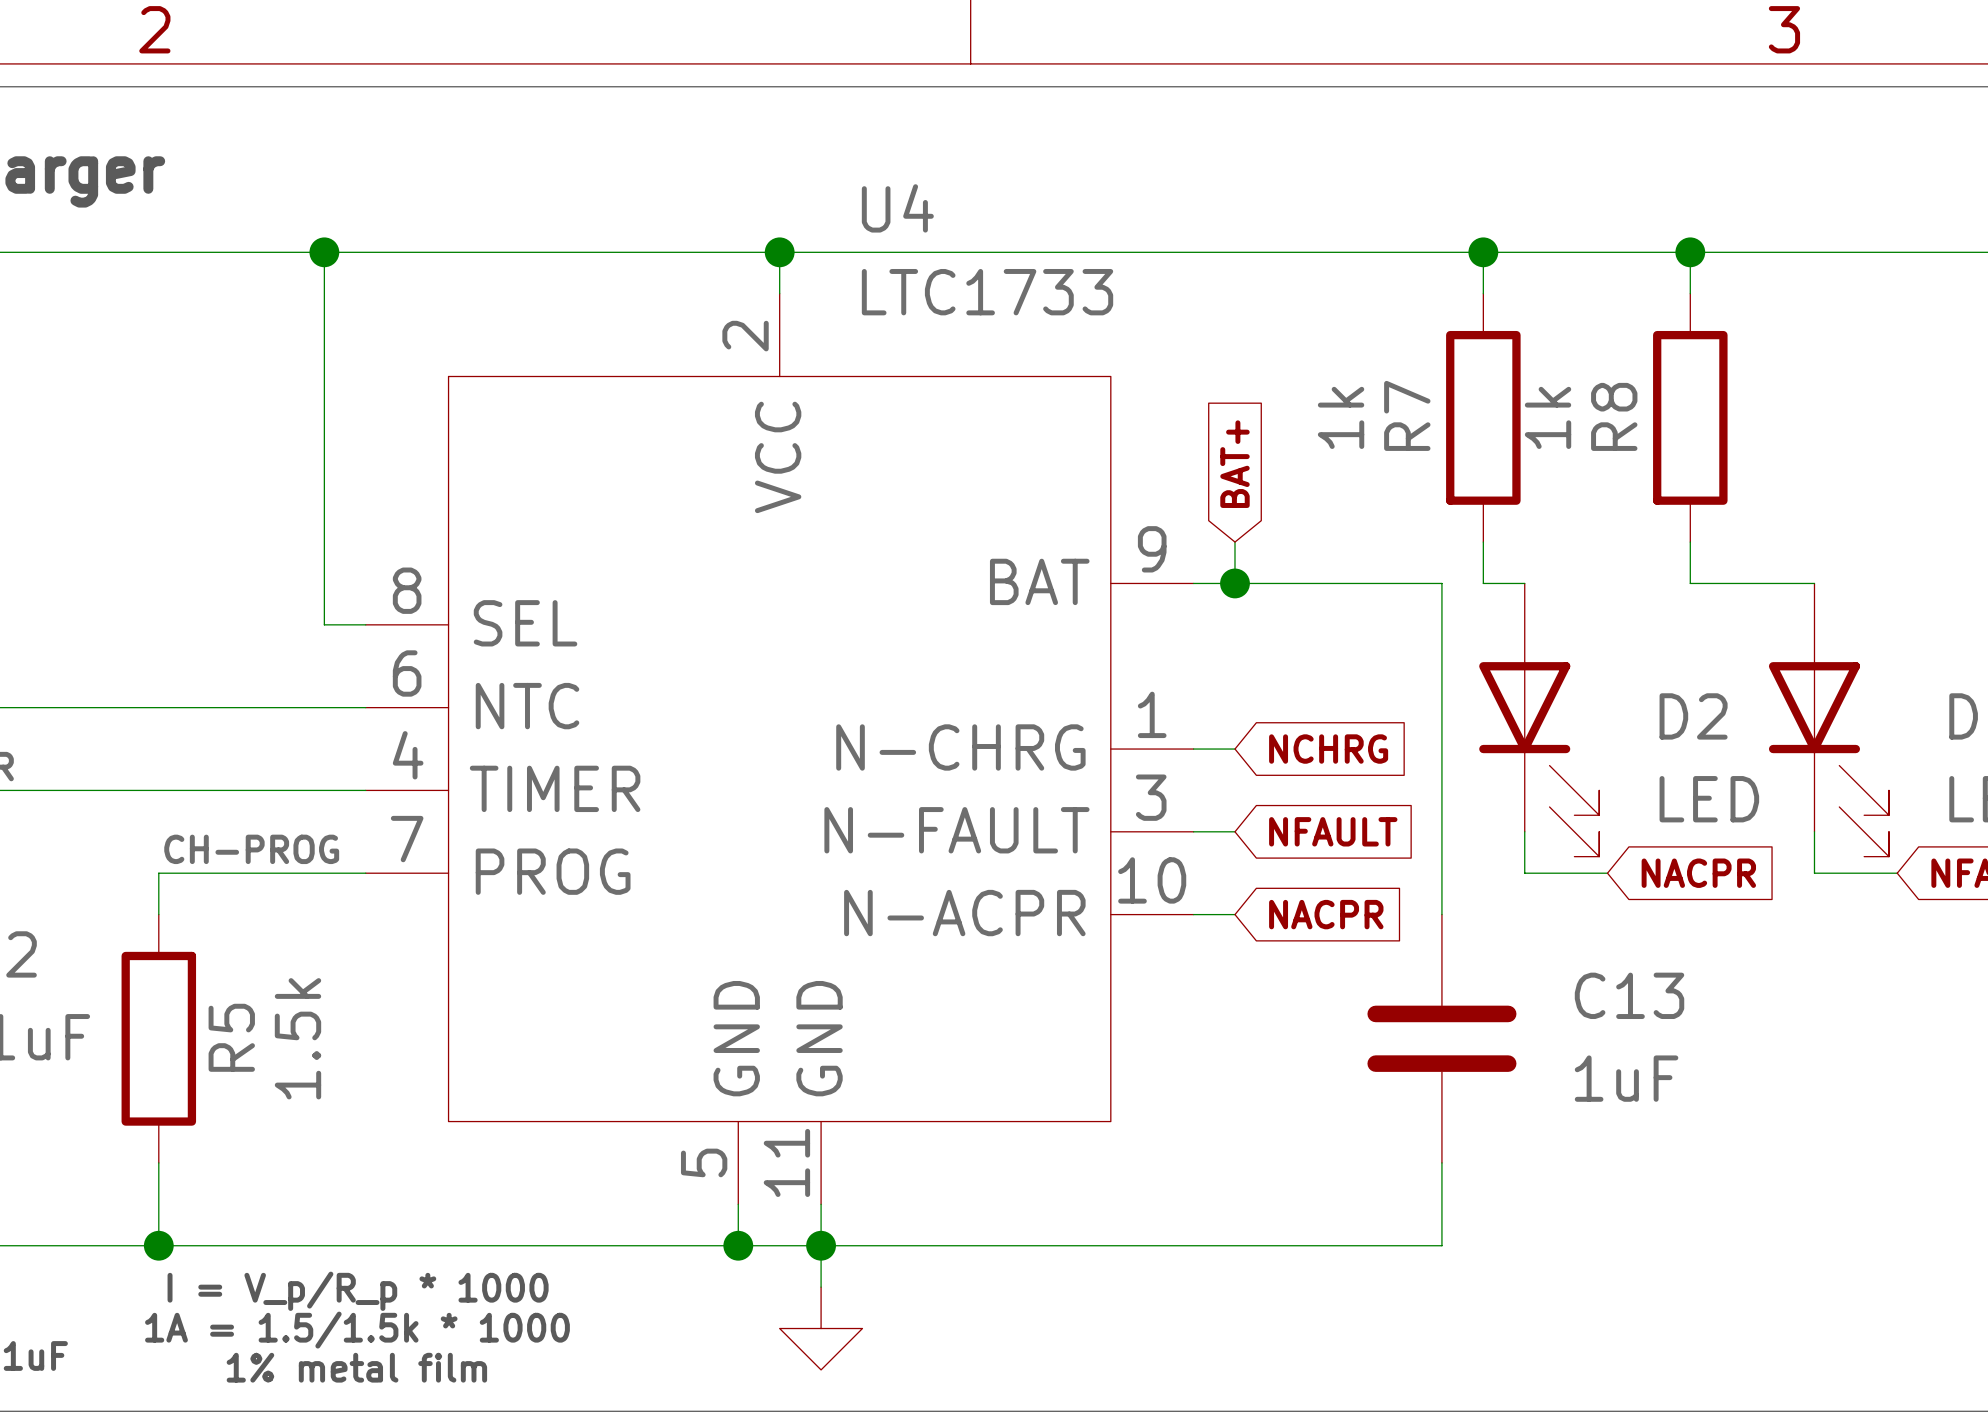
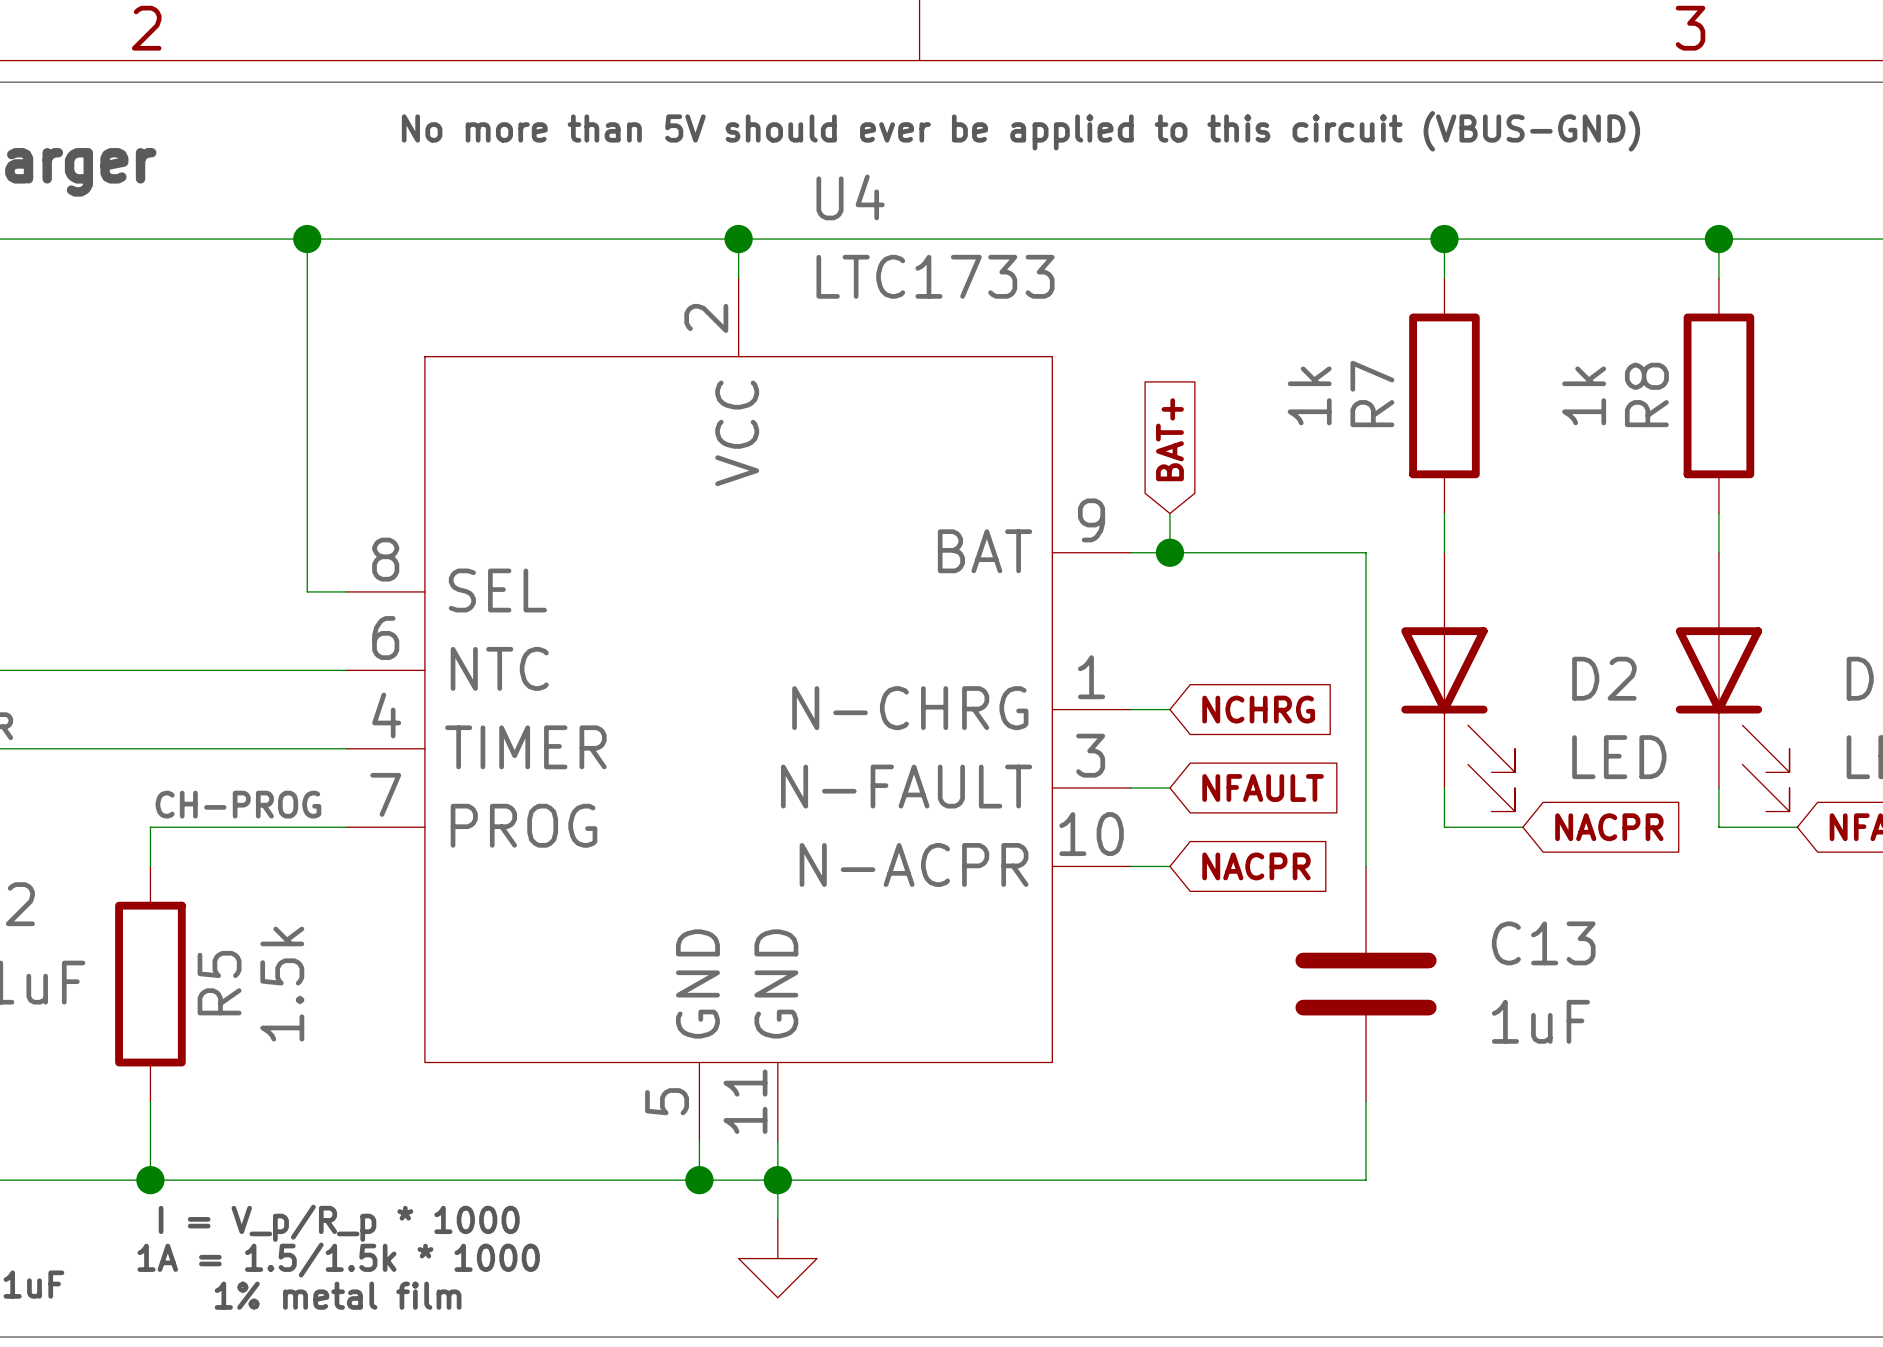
text: none -> No more than 5V should ever be applied to this circuit (VBUS-GND) (1020, 131)
wire: (1483, 252) (1483, 293) -> (1444, 239) (1444, 278)
junction position: (1483, 252) -> (1444, 239)
wire: (1690, 252) (1690, 293) -> (1718, 239) (1718, 278)
junction: (1690, 252) -> none
junction: none -> (1718, 239)
R7 position: (1483, 417) -> (1444, 395)
R8 position: (1690, 417) -> (1718, 395)
wire: (1483, 542) (1483, 583) (1524, 583) -> (1444, 513) (1444, 552)
wire: (1690, 542) (1690, 583) (1814, 583) -> (1718, 513) (1718, 552)

